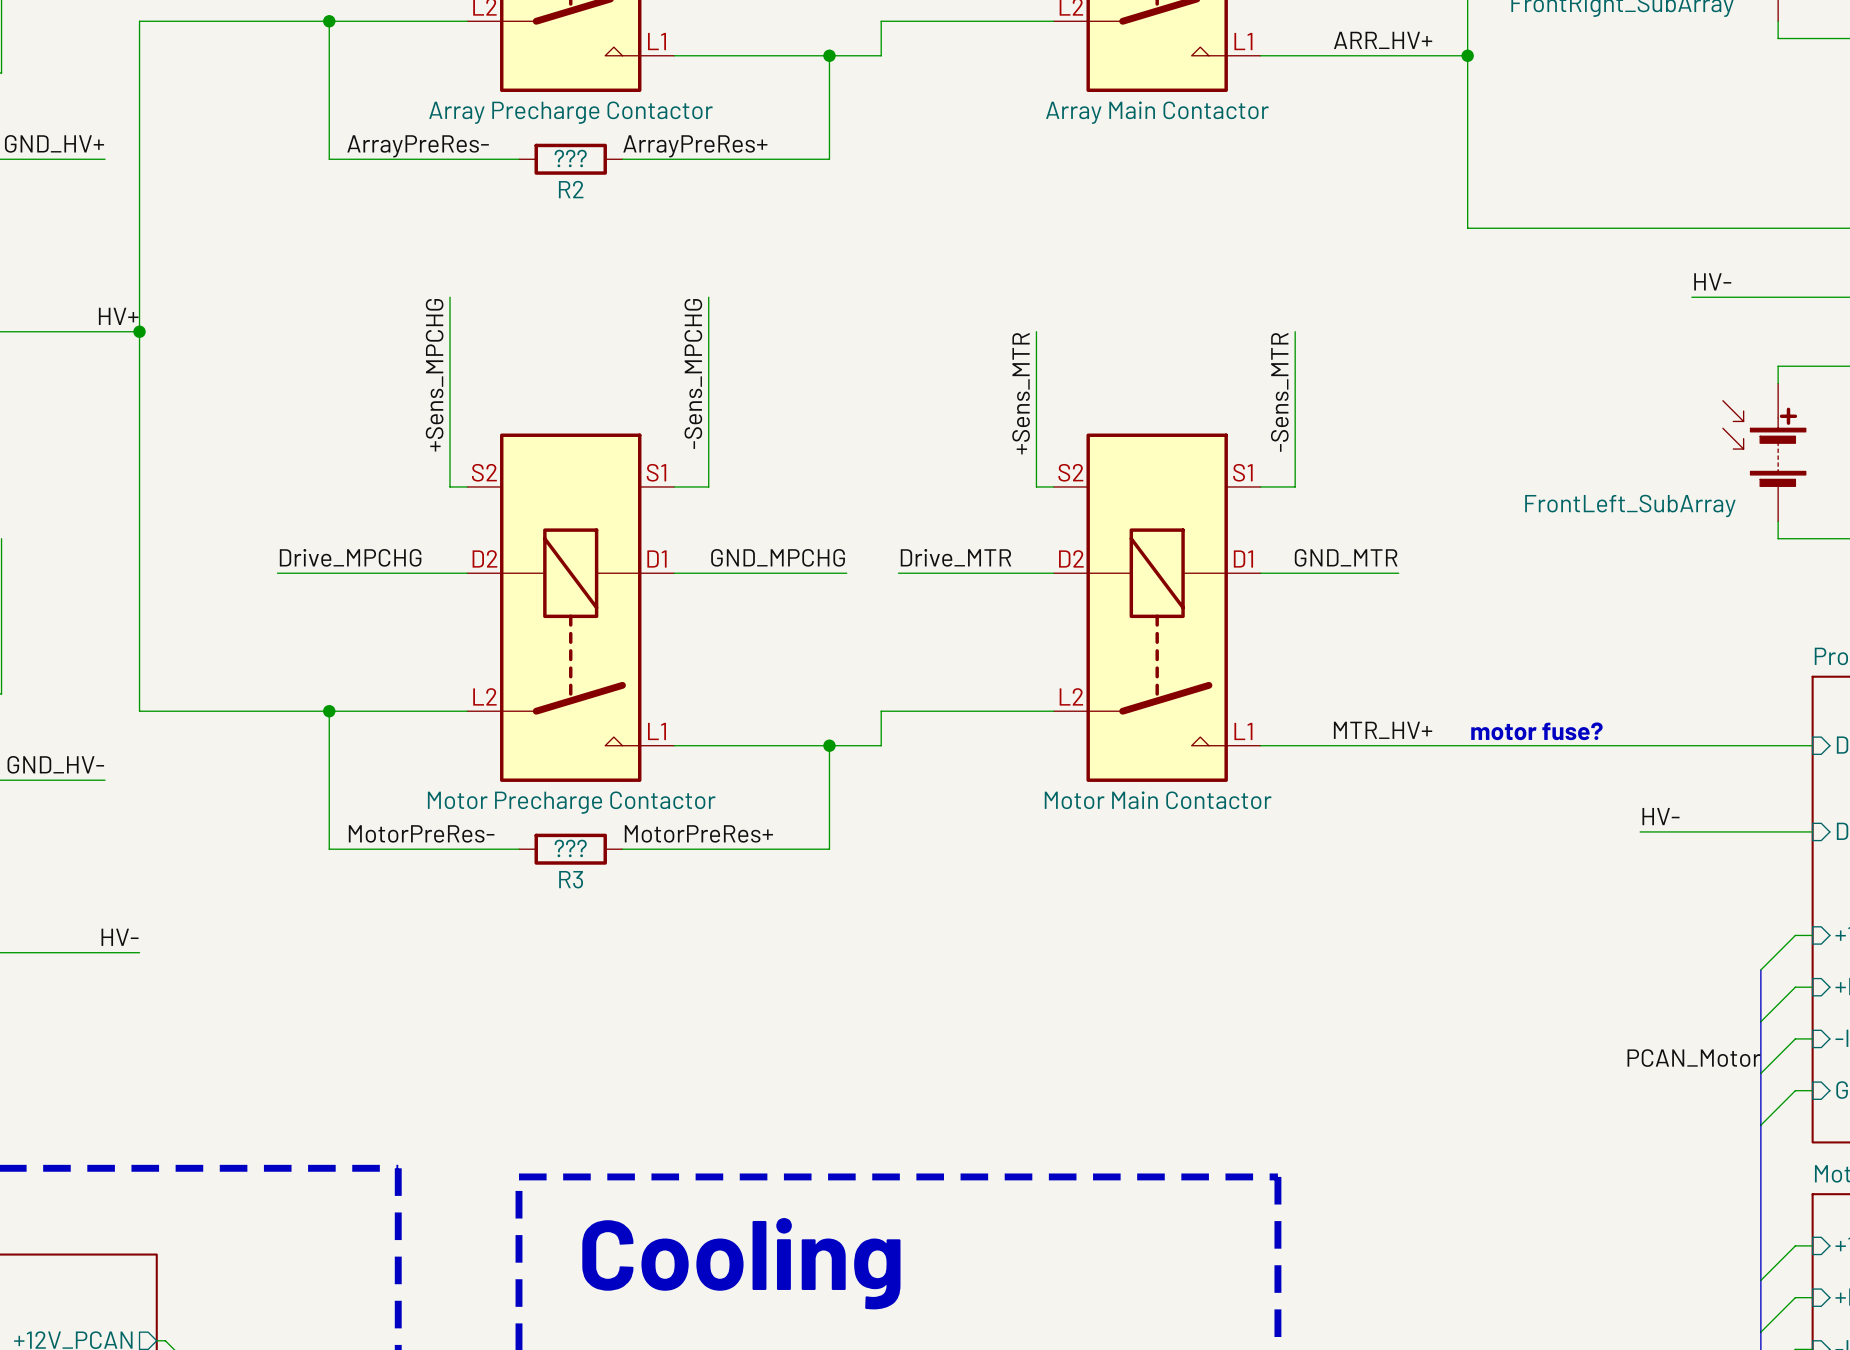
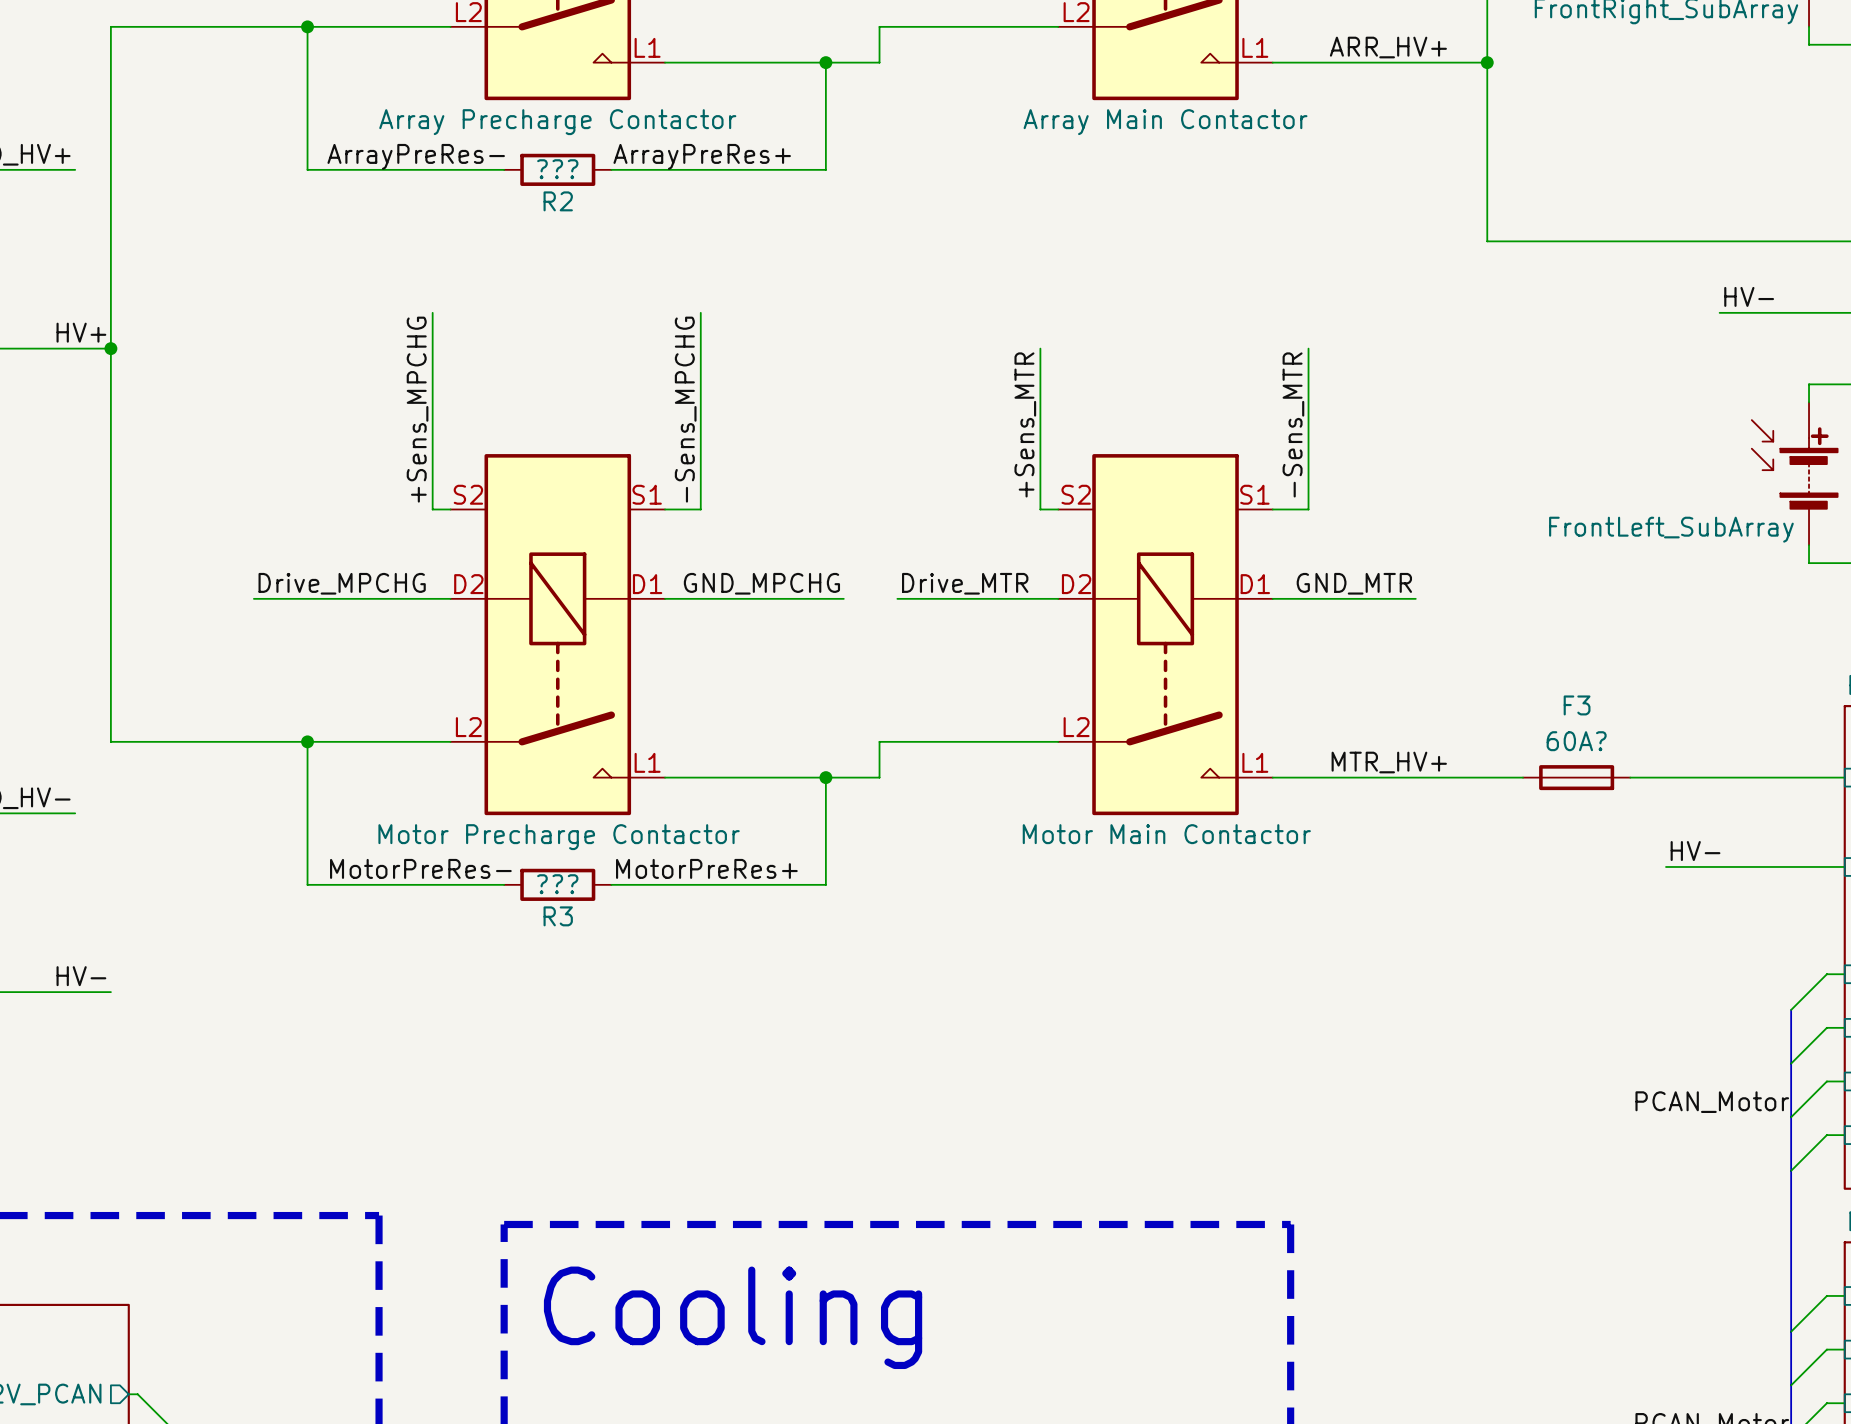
text: motor fuse? (1536, 731) -> none
F3: none -> 60A? (1576, 777)

